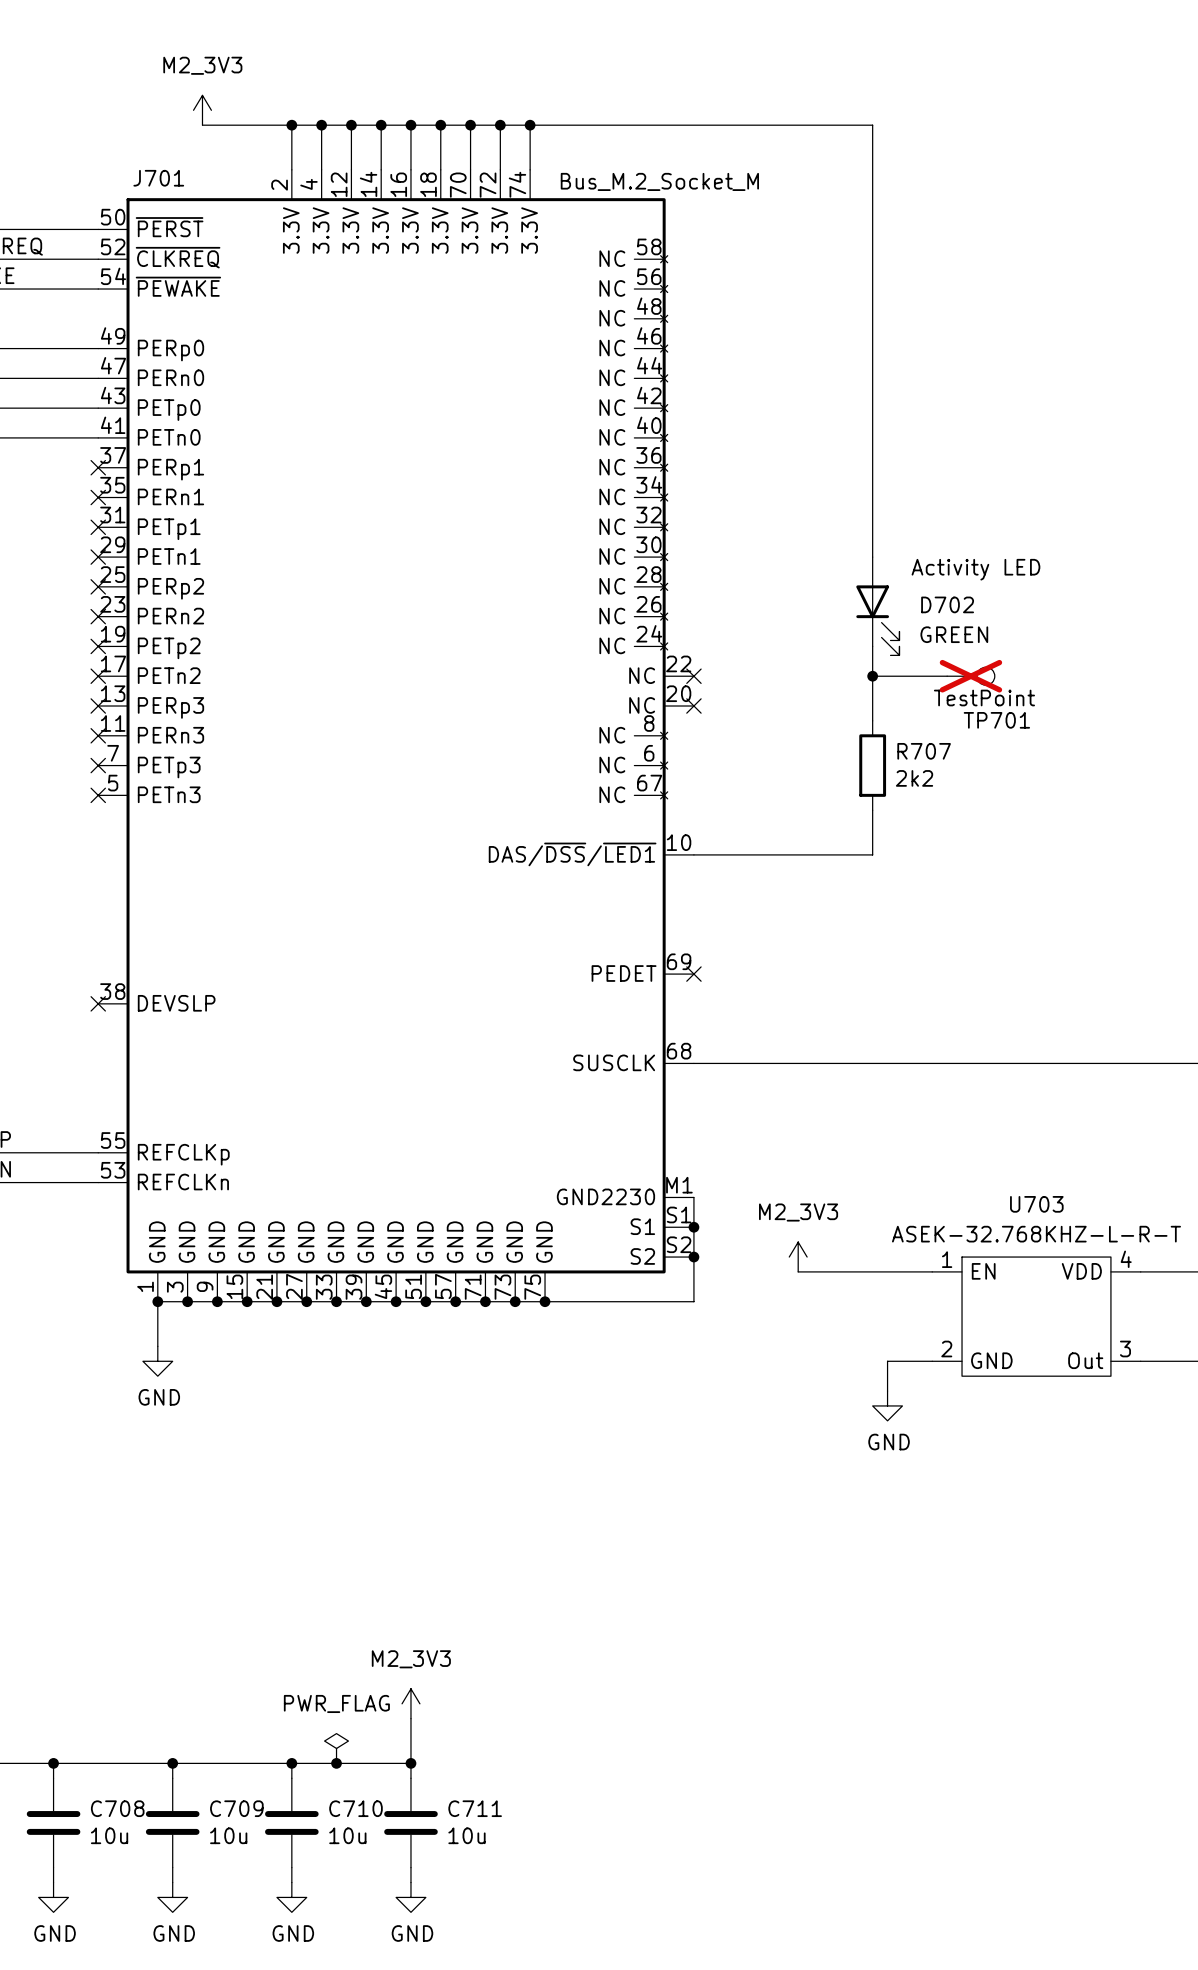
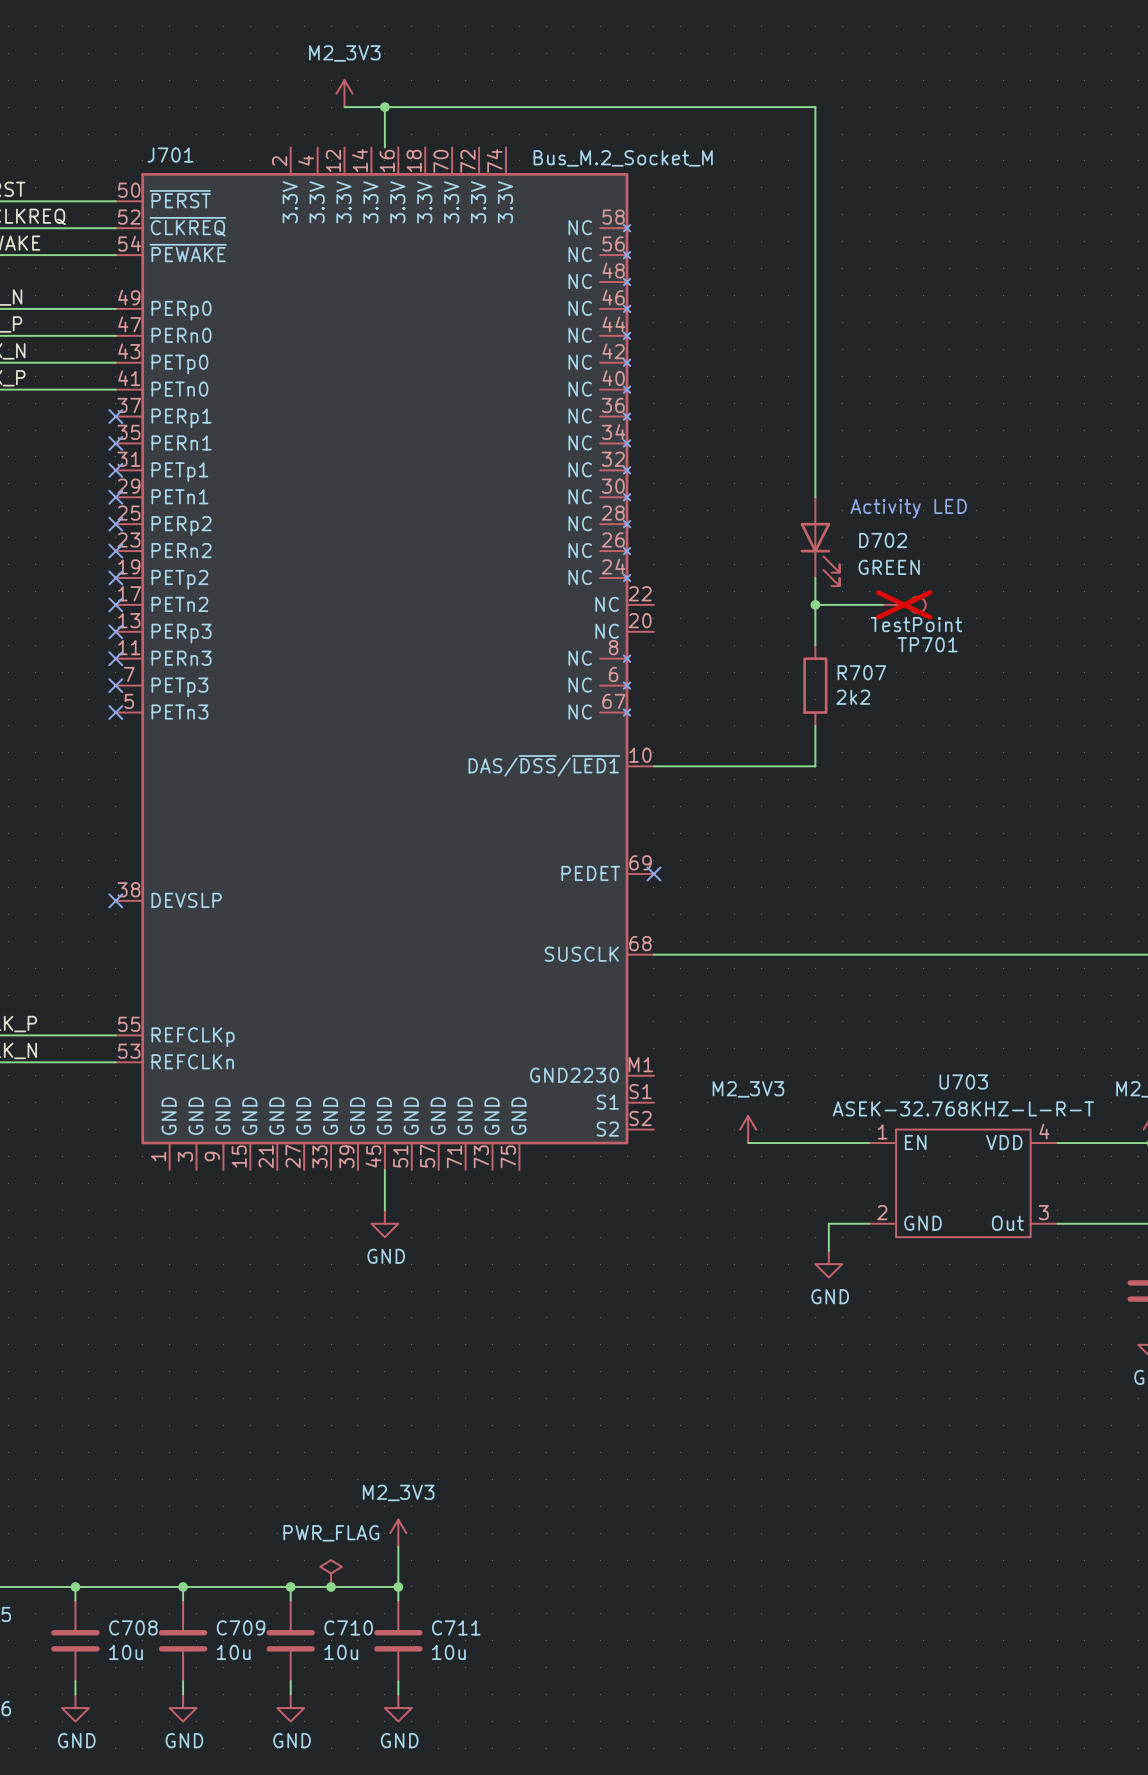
power symbol position: M2_3V3 (202, 110) -> M2_3V3 (344, 93)
wire: (202, 125) (351, 125) (351, 169) -> none
wire: (291, 125) (291, 169) -> none
junction: (291, 125) -> none
wire: (321, 125) (321, 169) -> none
junction: (321, 125) -> none
junction: (351, 125) -> none
wire: (381, 125) (381, 169) -> (384, 107) (384, 147)
junction: (381, 125) -> none
junction: none -> (384, 107)
wire: (410, 125) (410, 169) -> none
junction: (410, 125) -> none
wire: (440, 125) (440, 169) -> none
junction: (440, 125) -> none
wire: (470, 125) (470, 169) -> none
junction: (470, 125) -> none
wire: (500, 125) (500, 169) -> none
junction: (500, 125) -> none
wire: (530, 125) (530, 169) -> none
junction: (530, 125) -> none
no-connect mark: (693, 676) -> none
no-connect mark: (693, 706) -> none
wire: (693, 1197) (693, 1301) (157, 1301) (157, 1346) -> none
junction: (693, 1227) -> none
junction: (693, 1257) -> none
junction: (157, 1301) -> none
junction: (187, 1301) -> none
junction: (217, 1301) -> none
junction: (247, 1301) -> none
junction: (276, 1301) -> none
junction: (306, 1301) -> none
junction: (336, 1301) -> none
junction: (366, 1301) -> none
wire: none -> (384, 1169) (384, 1210)
junction: (396, 1301) -> none
junction: (425, 1301) -> none
junction: (455, 1301) -> none
junction: (485, 1301) -> none
junction: (515, 1301) -> none
junction: (545, 1301) -> none
power symbol position: GND (157, 1361) -> GND (384, 1223)

